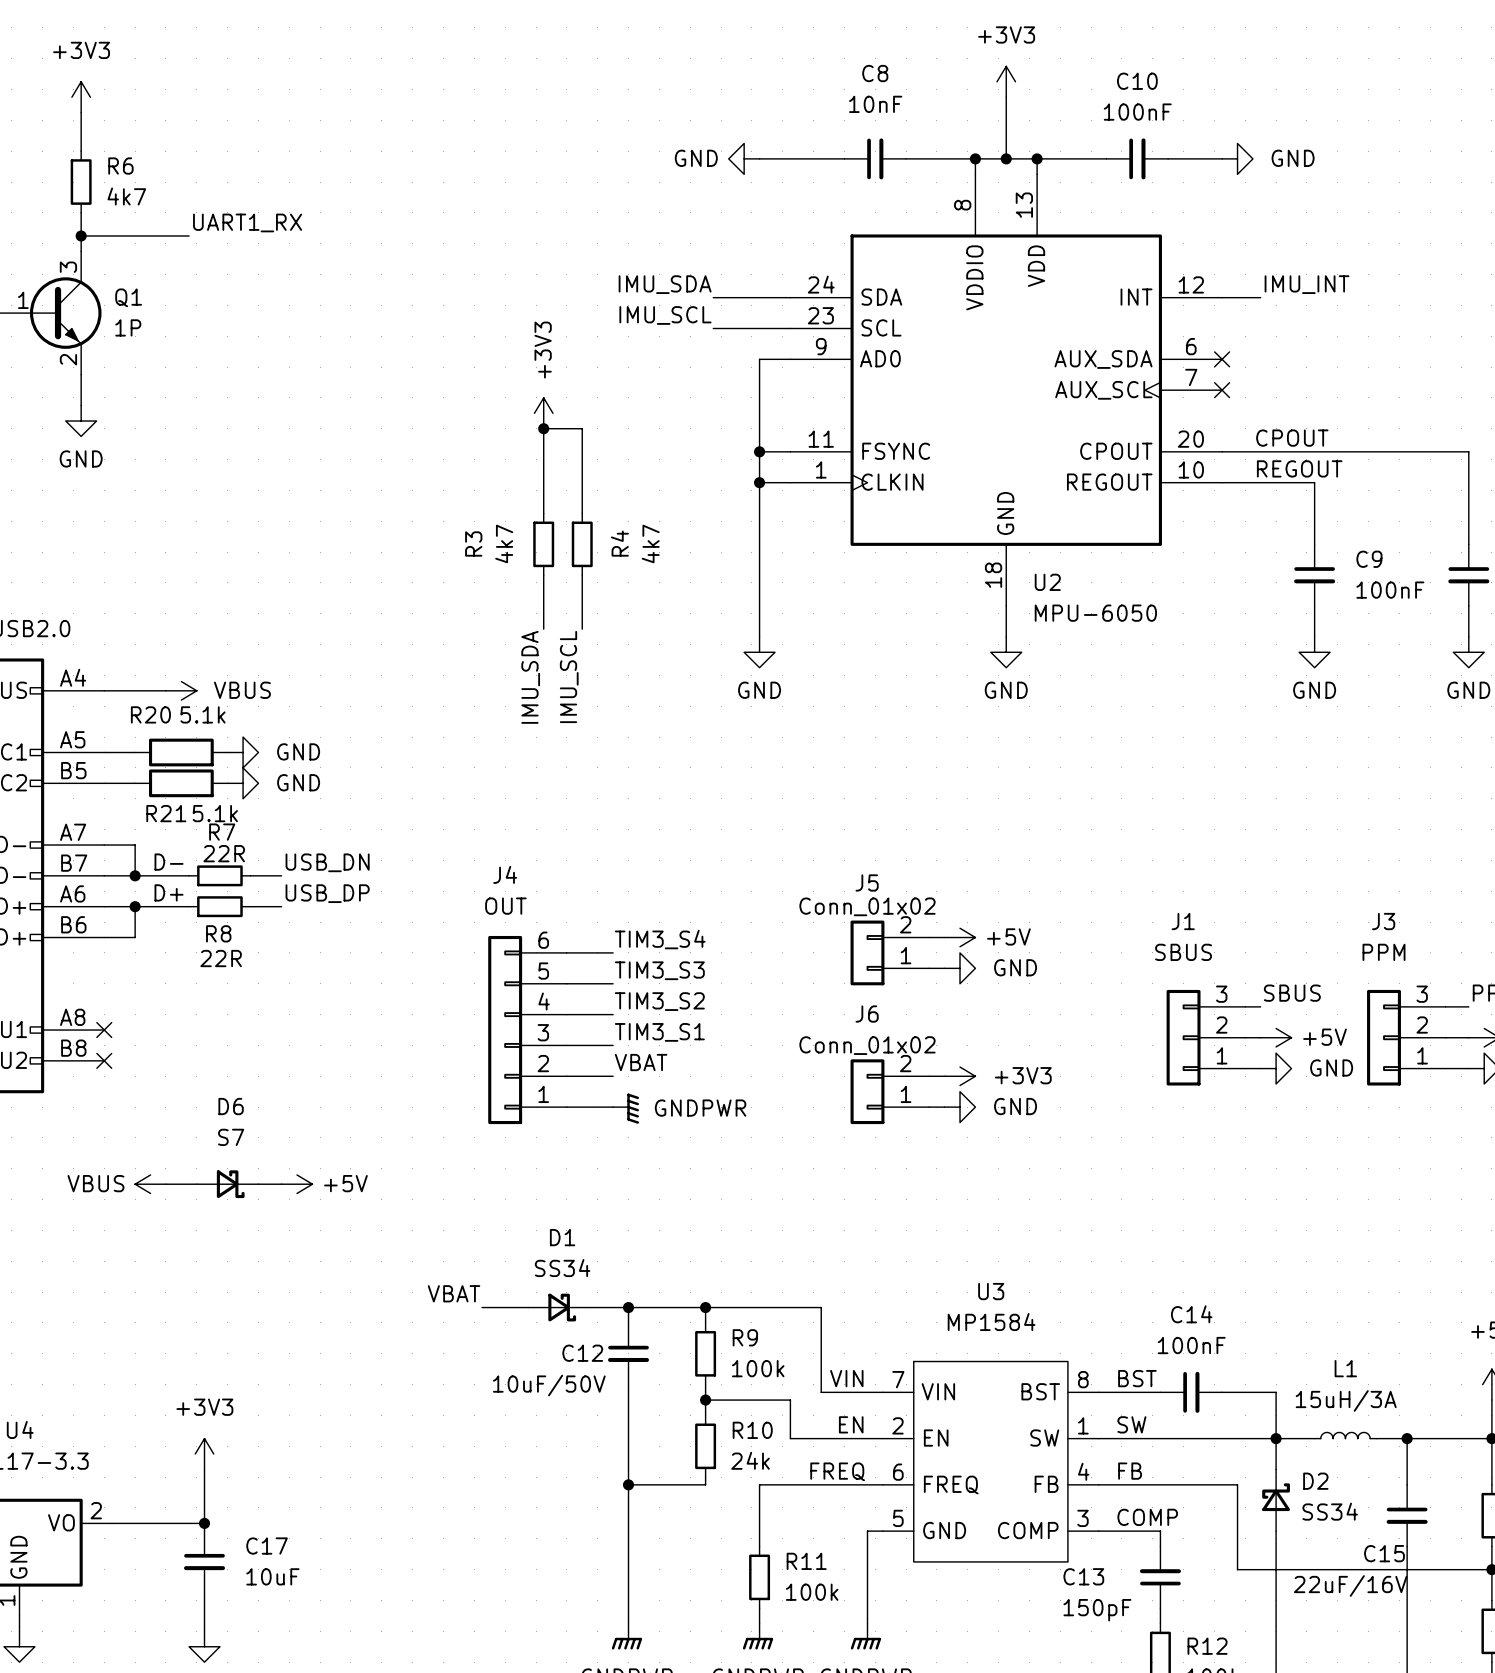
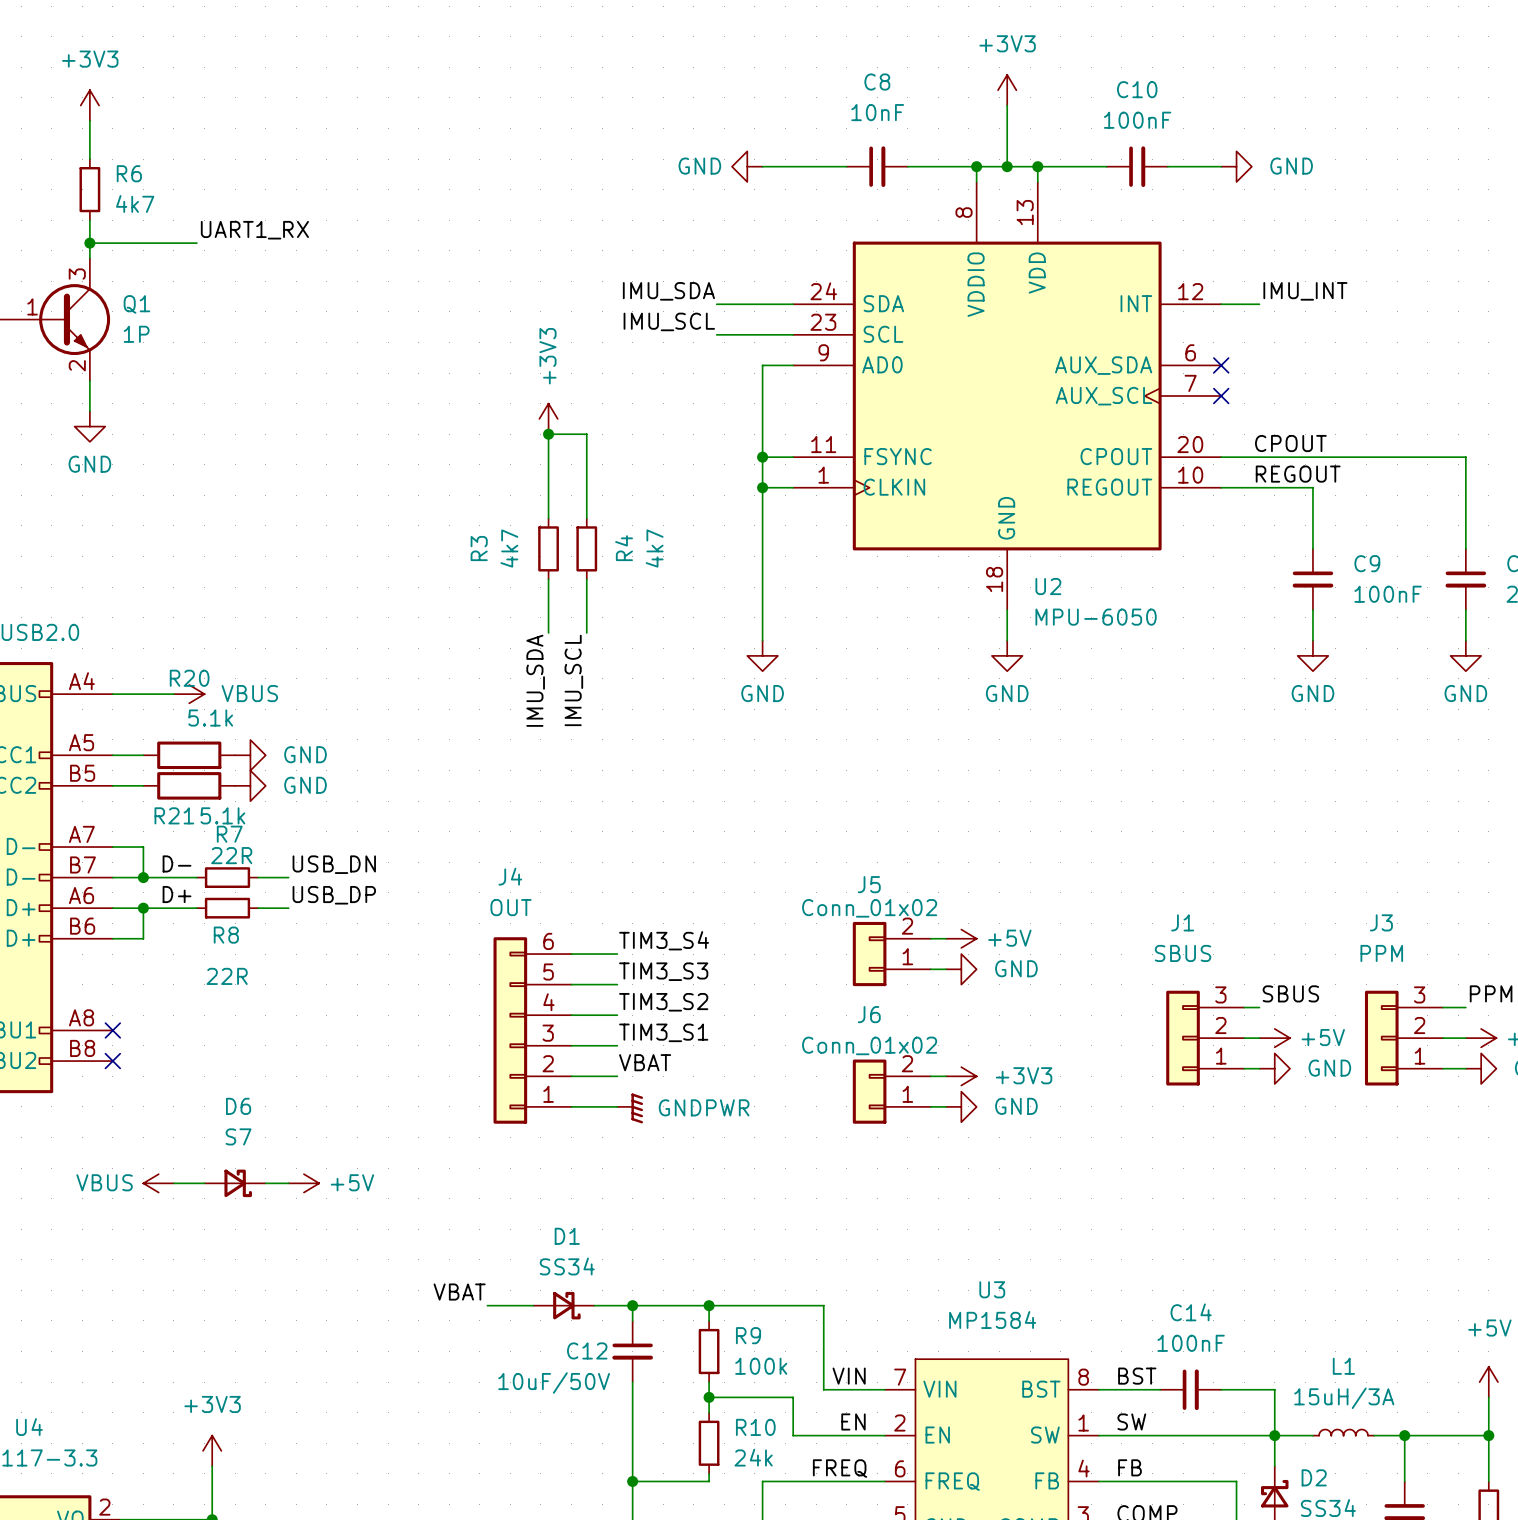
R20 name position: R20 (150, 714) -> R20 (189, 678)
R8 value position: 22R (221, 958) -> 22R (227, 976)

